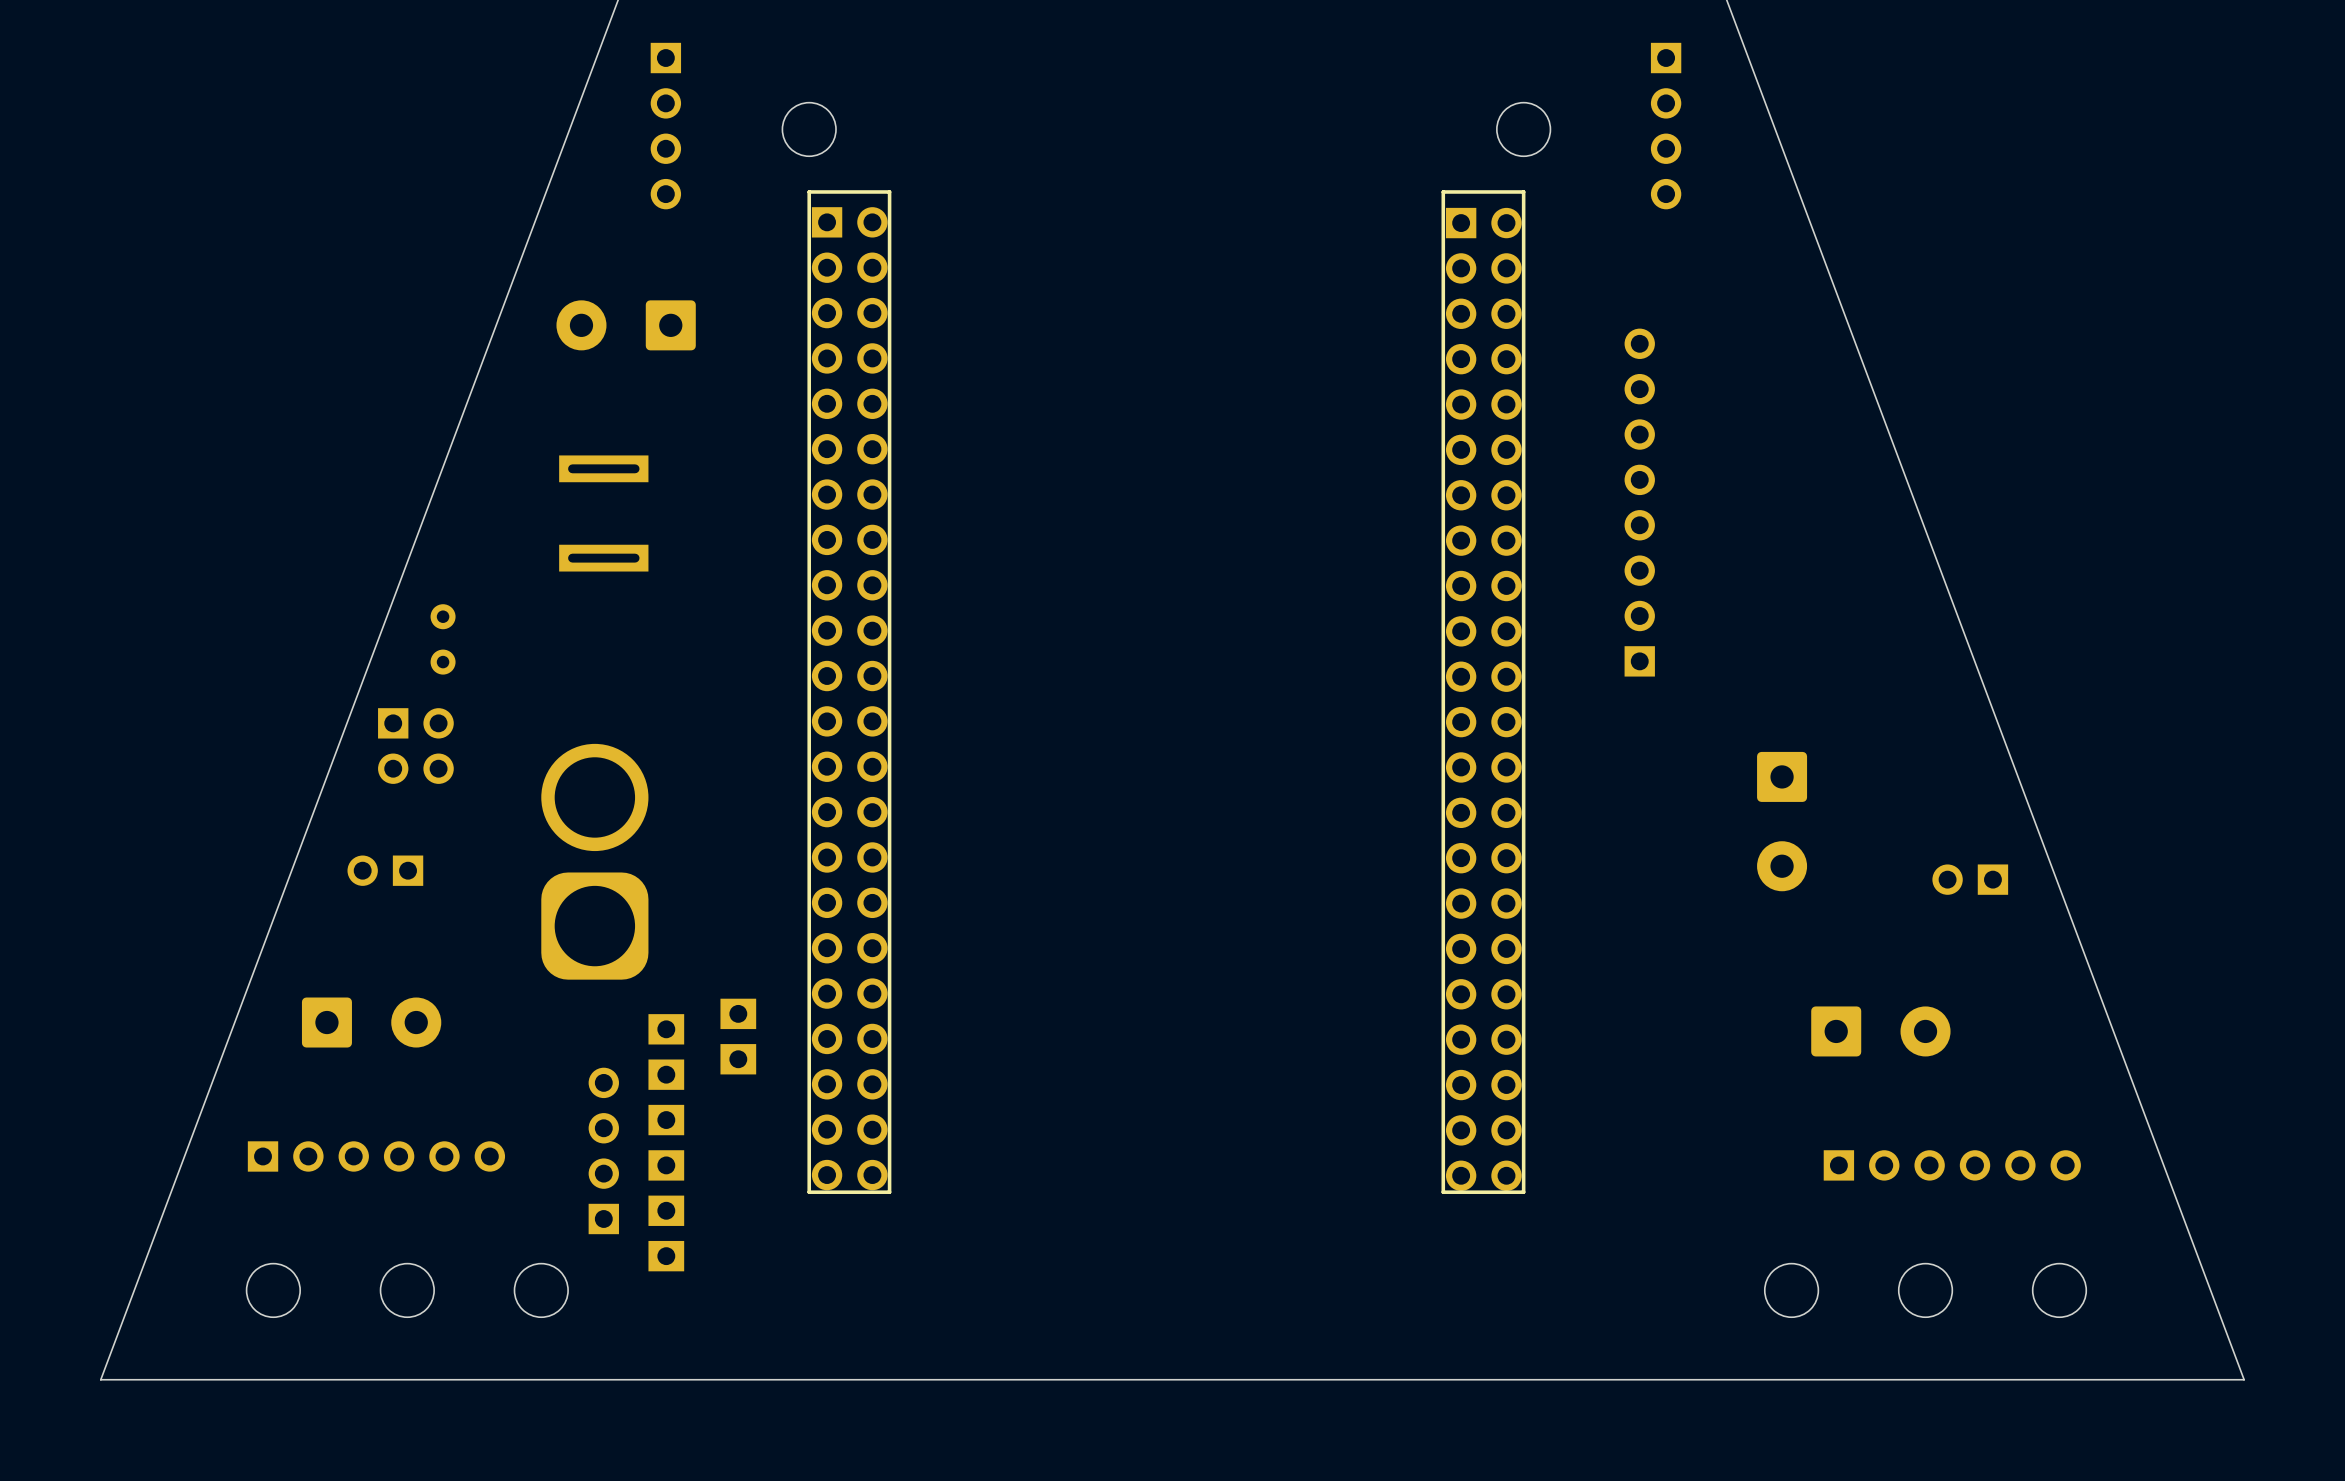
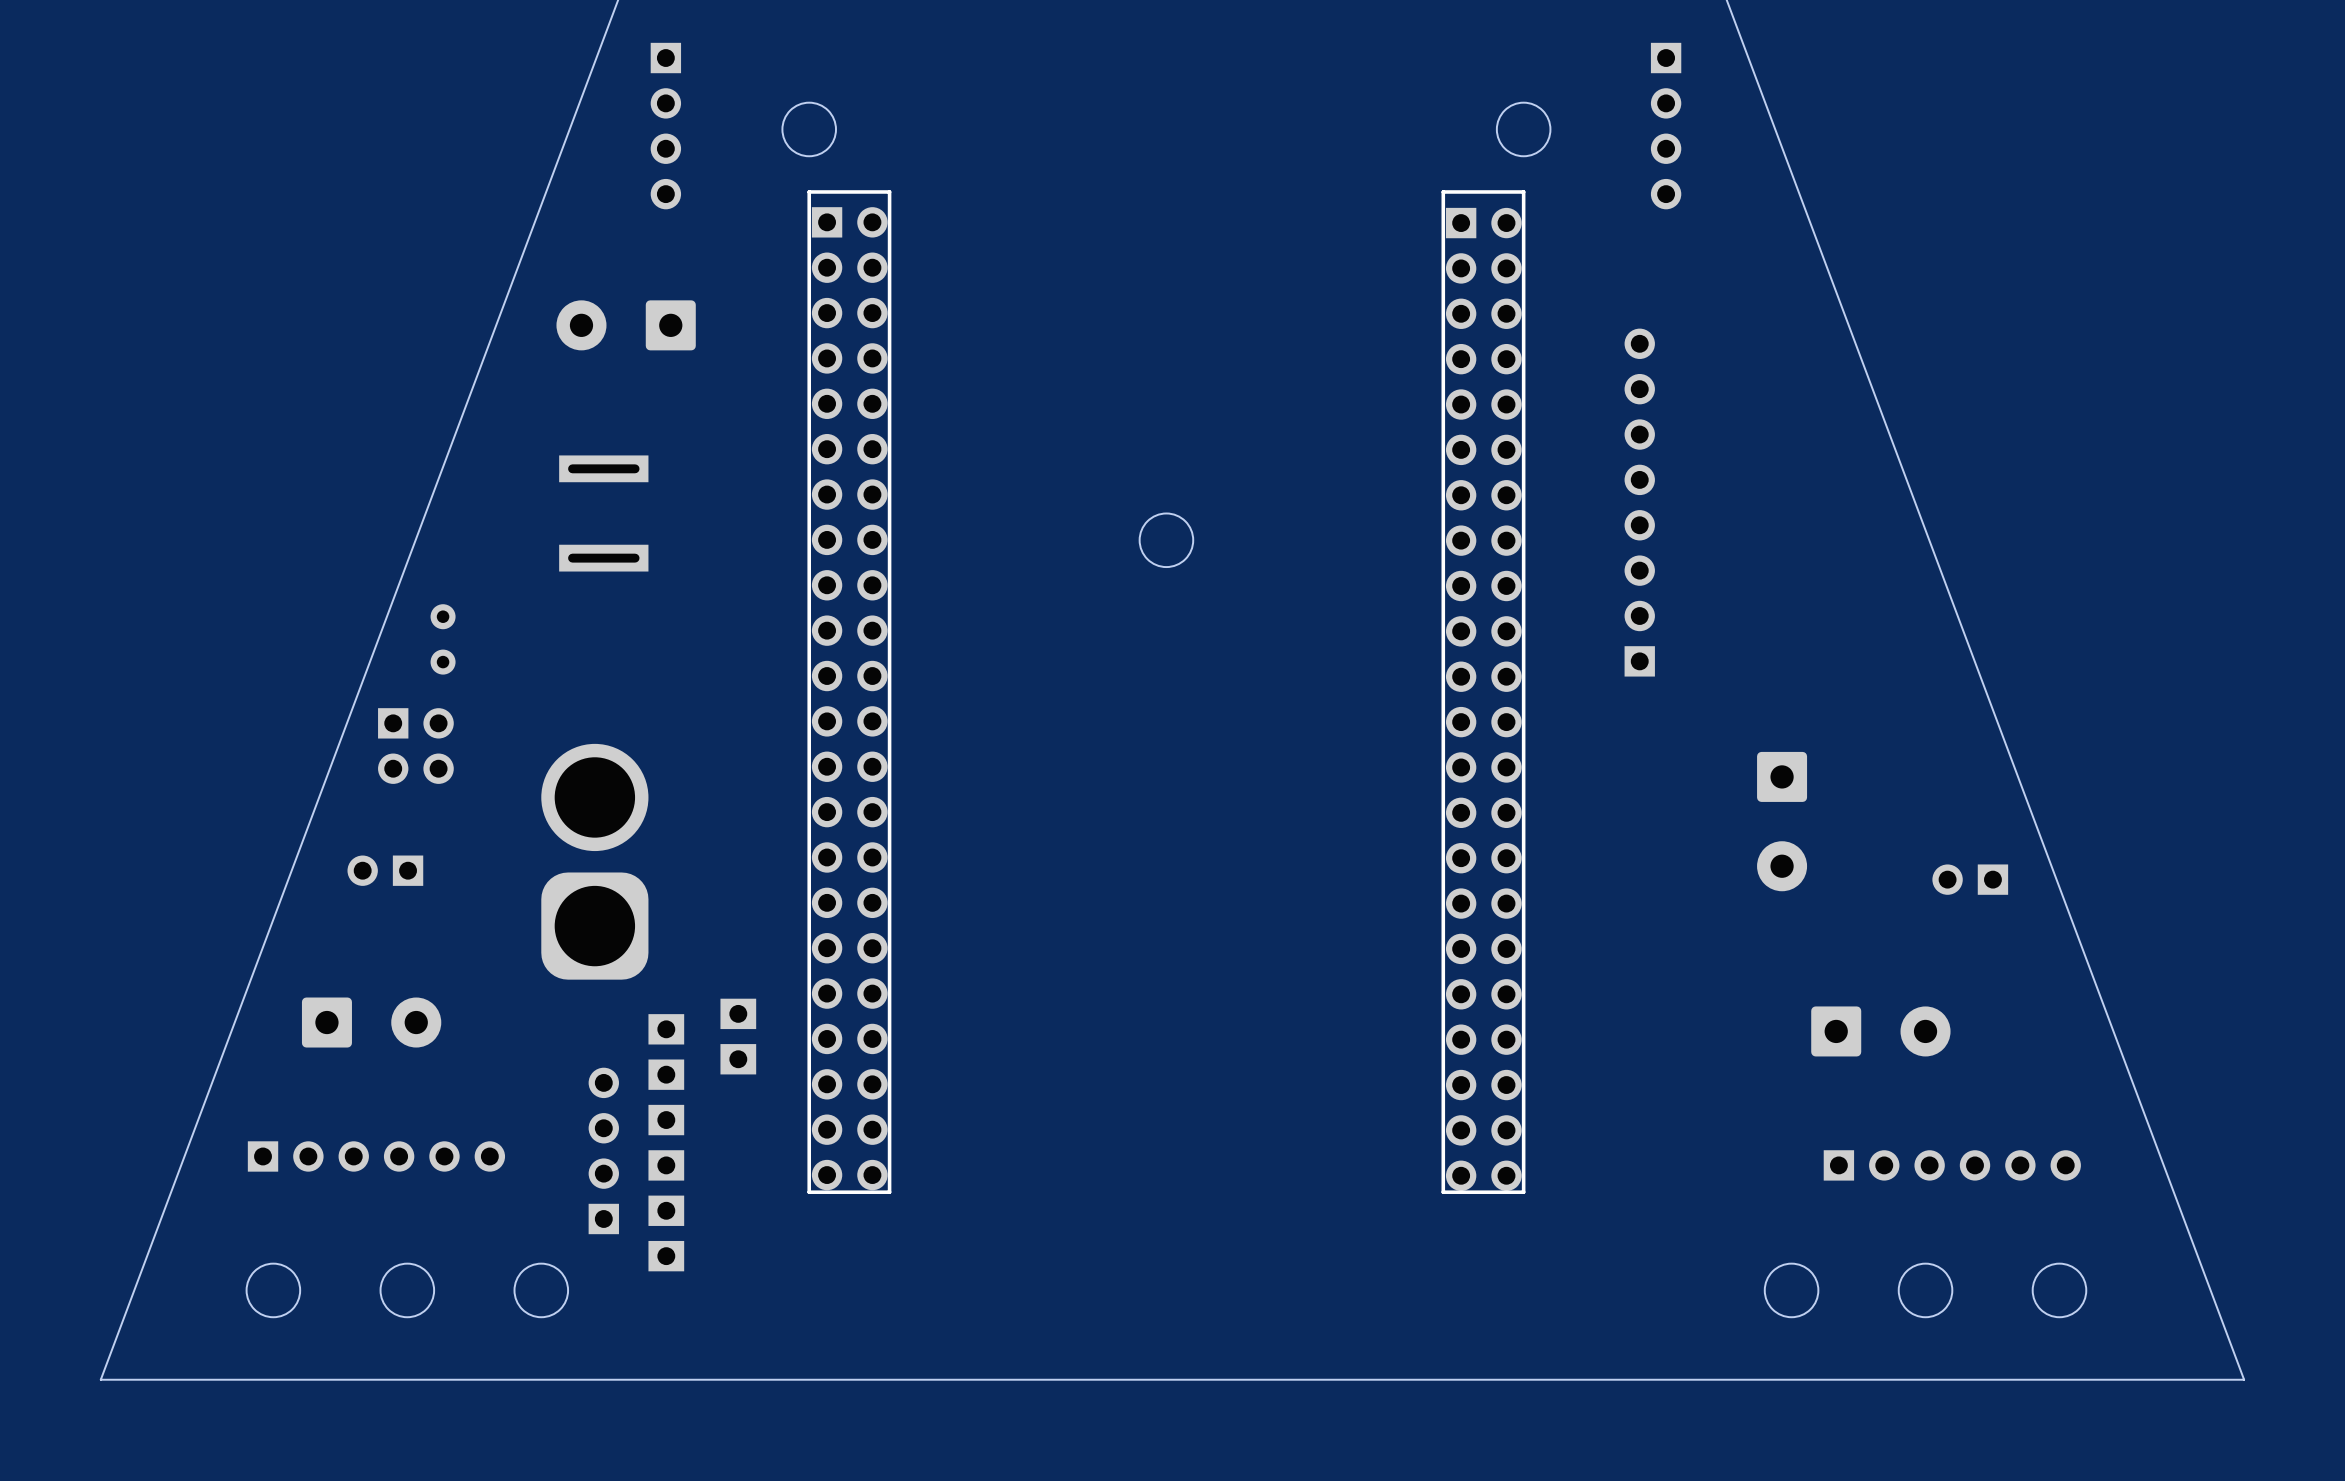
round board edge: none -> [1139, 513, 1194, 568]

